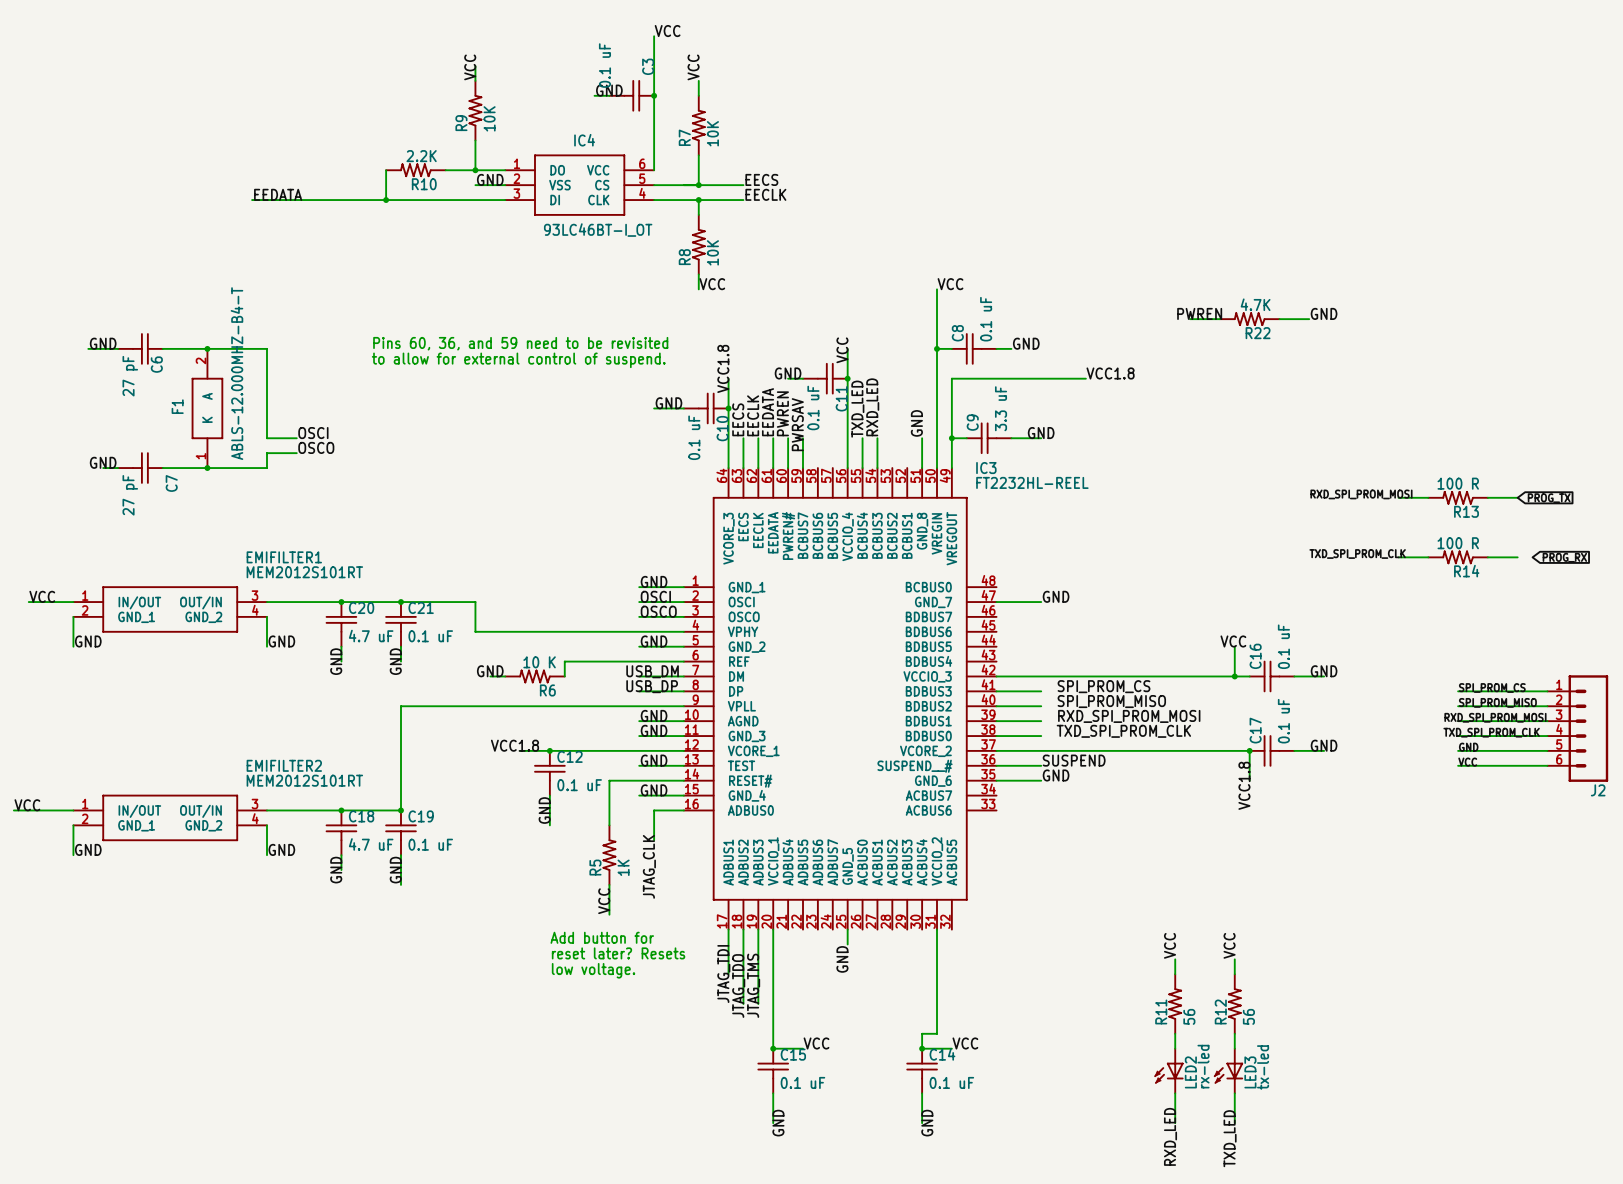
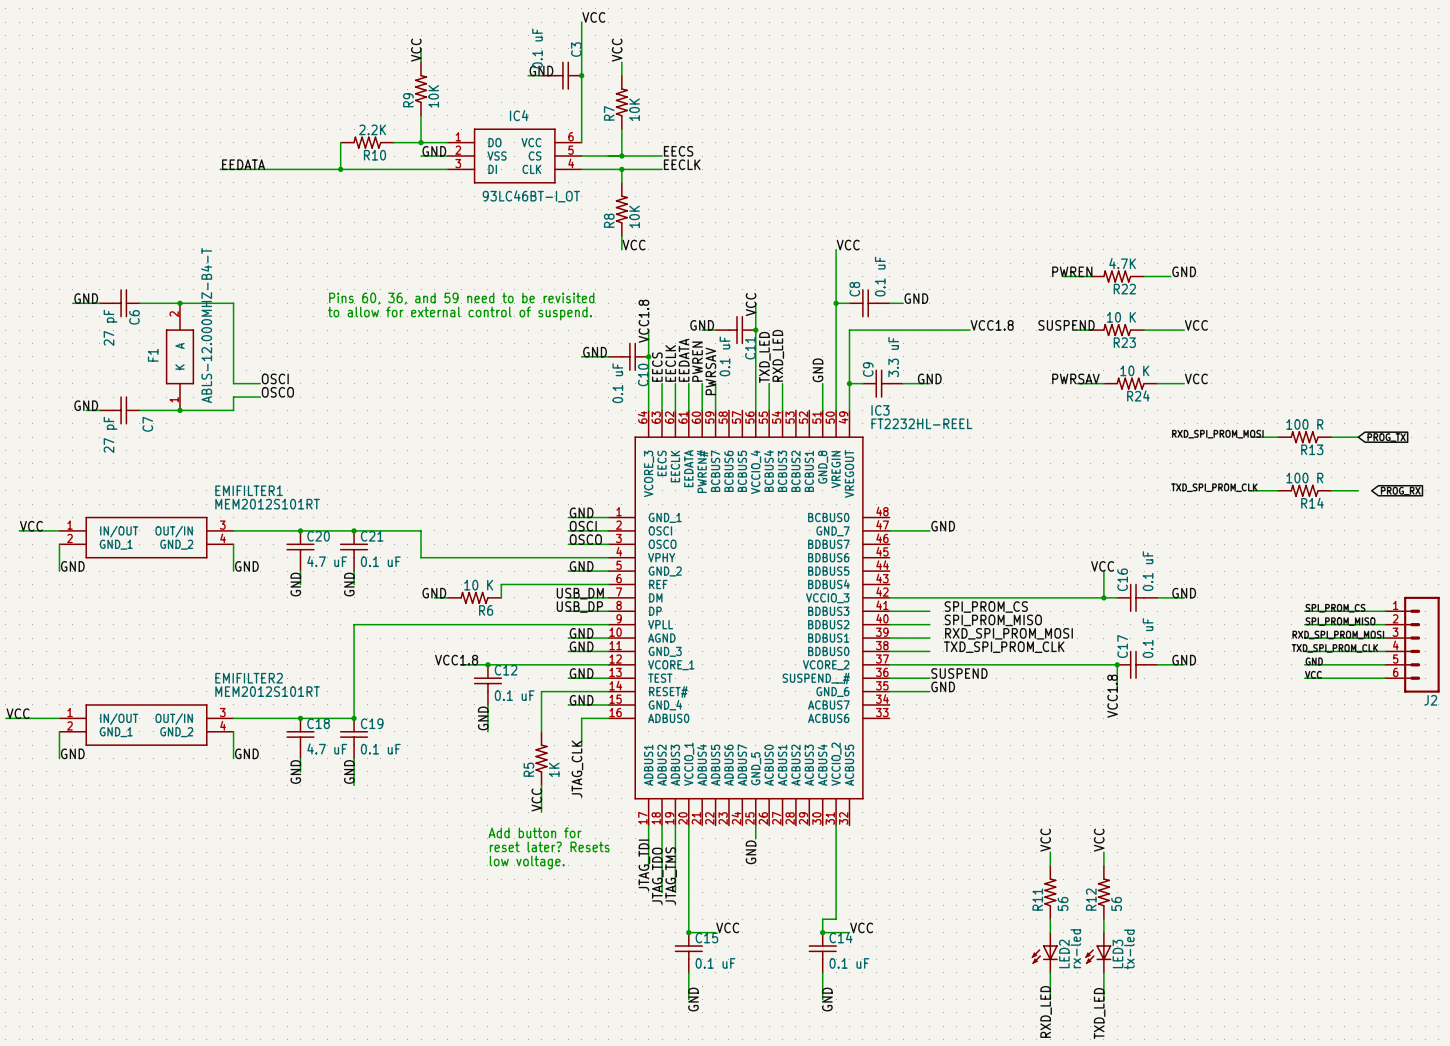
label: none -> SUSPEND (1066, 325)
label: none -> VCC (1196, 325)
wire: none -> (1077, 330) (1090, 330)
R23: none -> 10 K (1117, 330)
wire: none -> (1144, 330) (1184, 330)
label: none -> PWRSAV (1075, 378)
label: none -> VCC (1196, 378)
wire: none -> (1077, 383) (1103, 383)
R24: none -> 10 K (1130, 383)
wire: none -> (1157, 383) (1184, 383)

